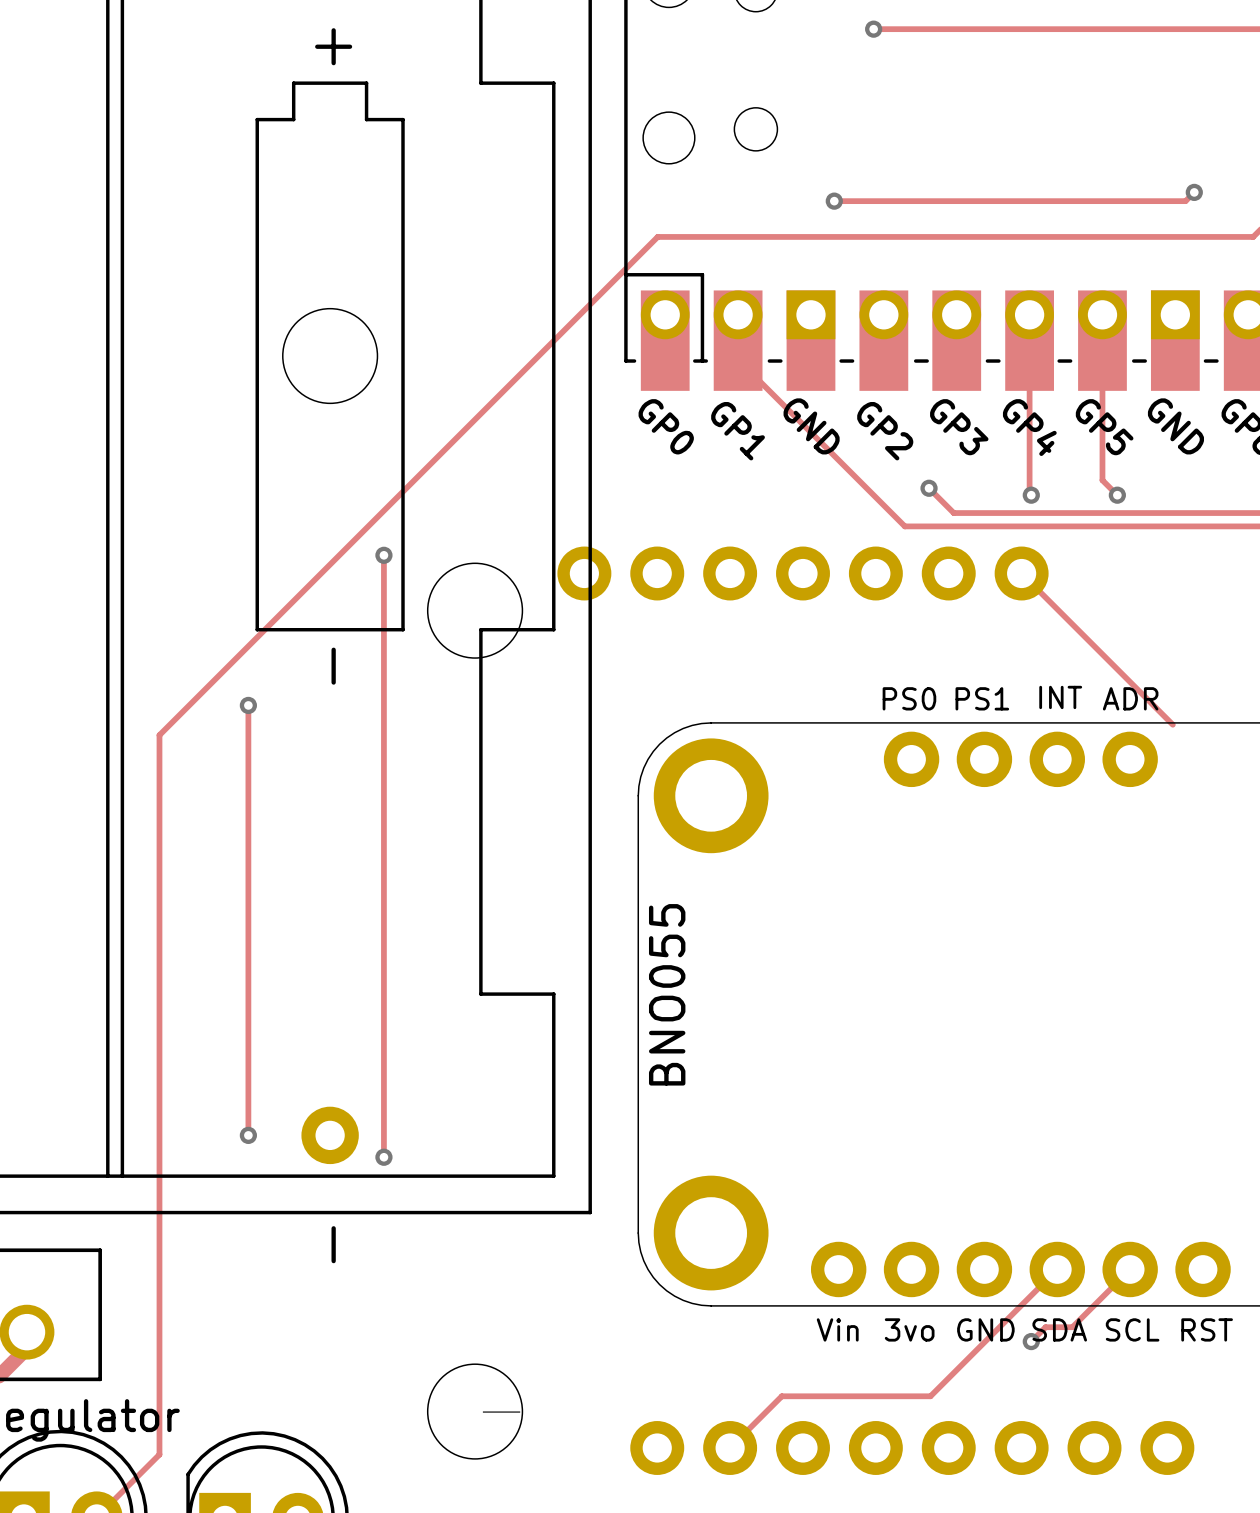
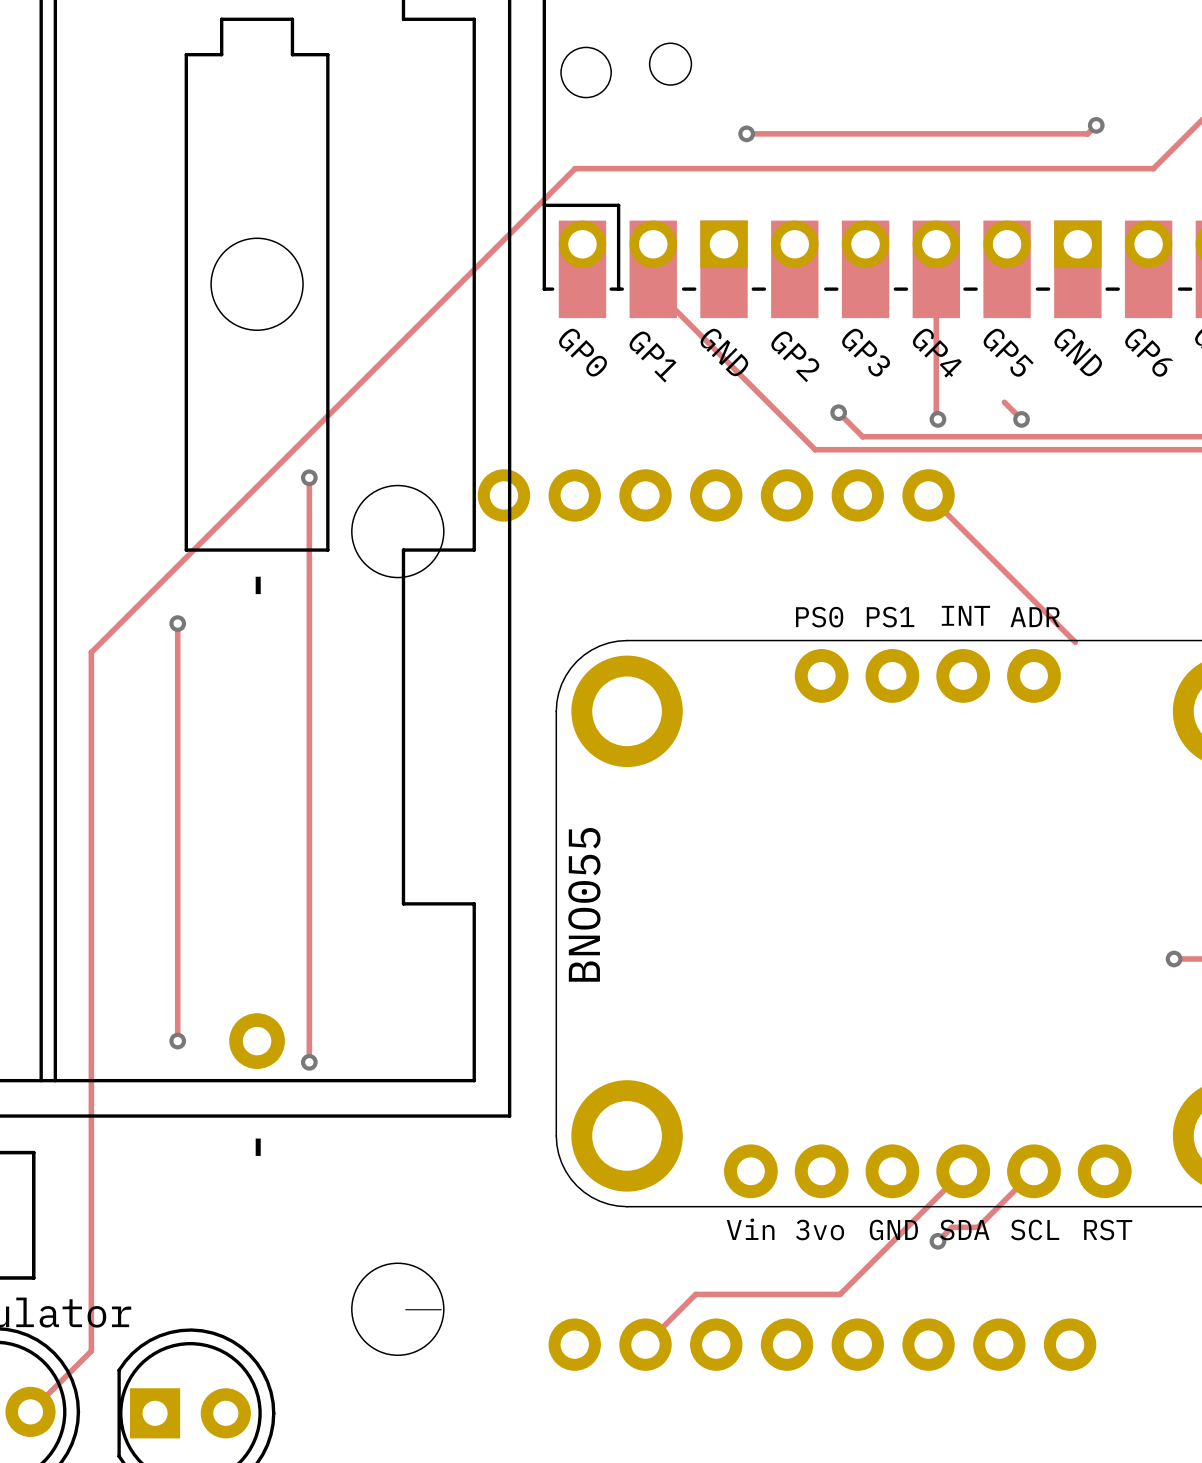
track: (1102, 314) (1102, 480) -> (1004, 402) (1007, 404)

